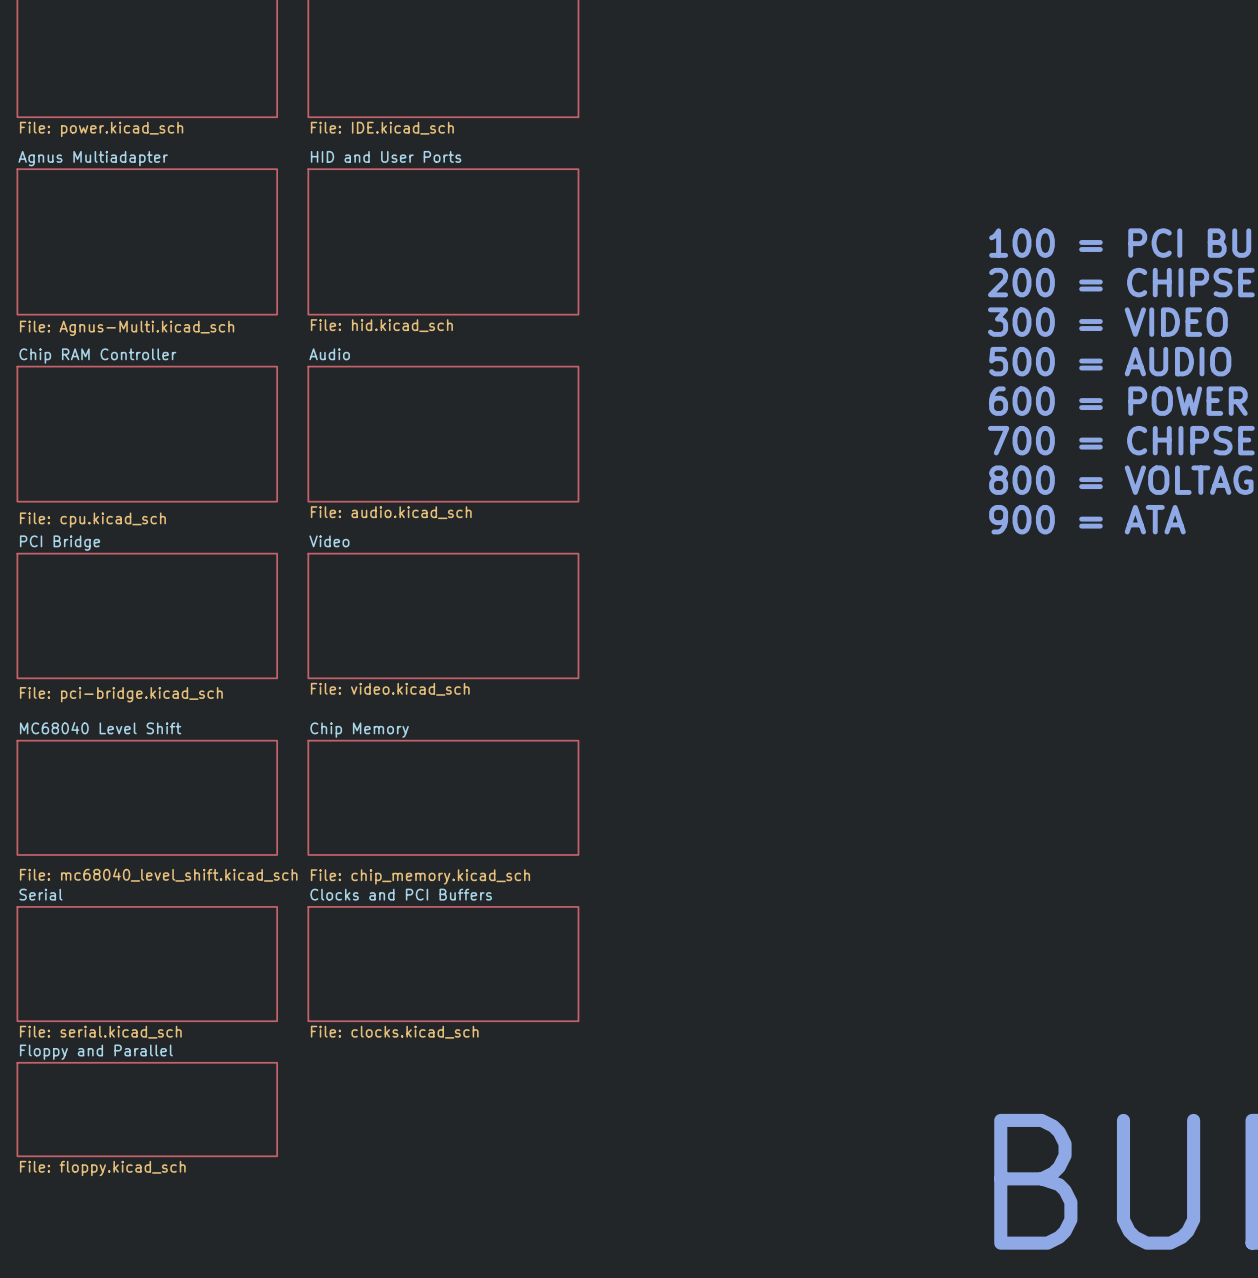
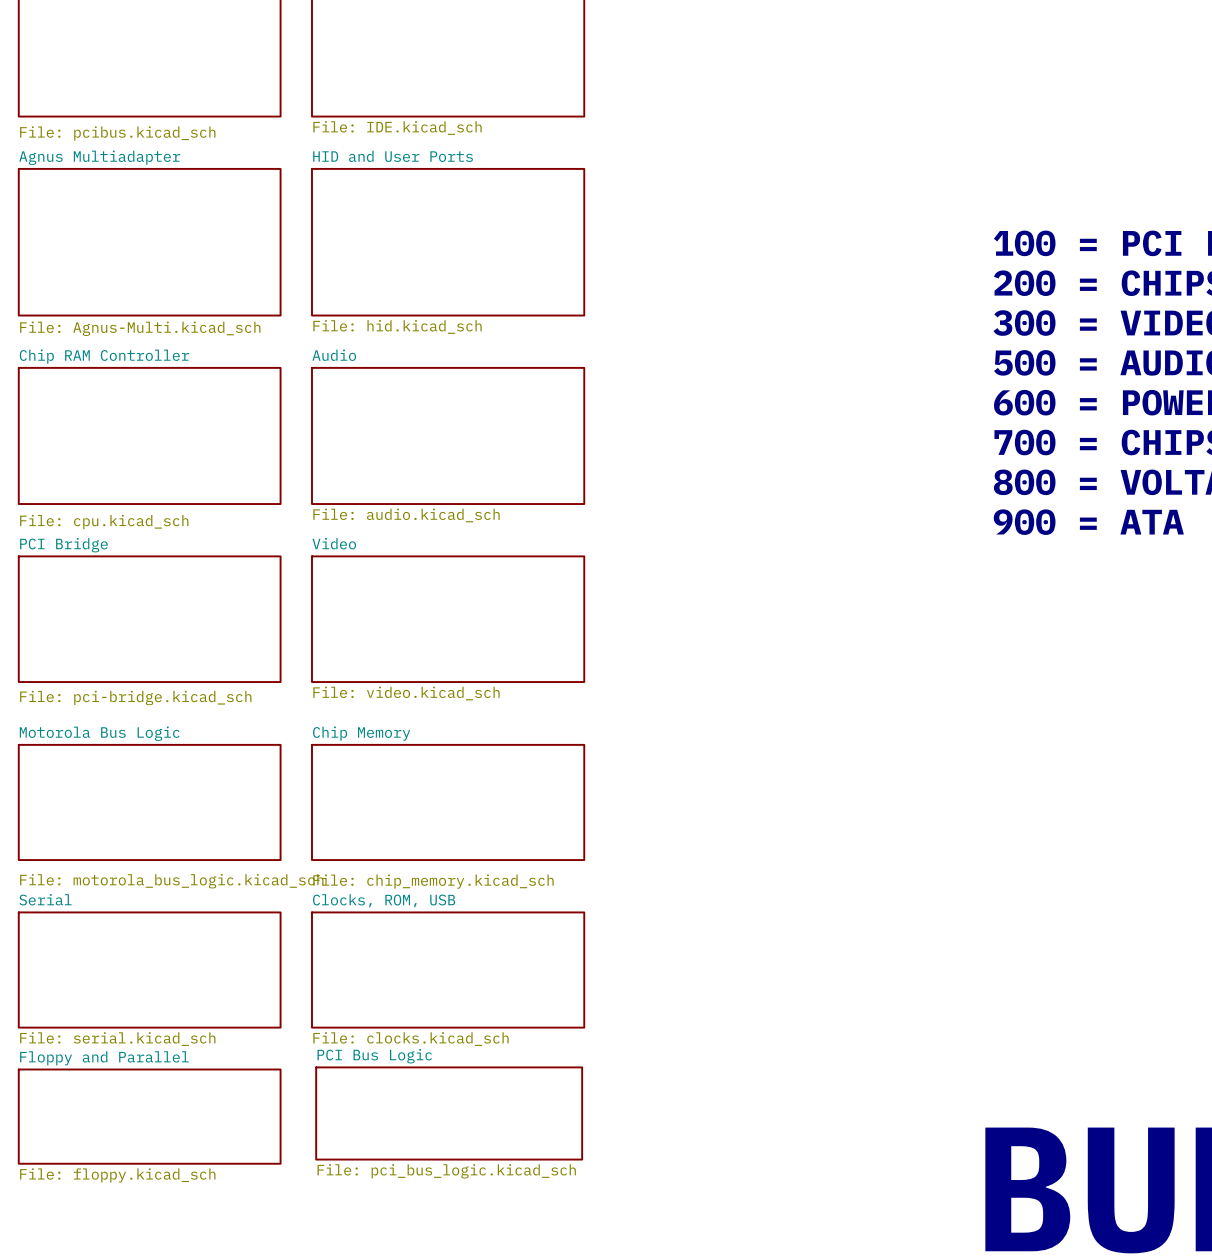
sheet value: File: power.kicad_sch (101, 129) -> File: pcibus.kicad_sch (117, 133)
sheet MC68040 Level Shift name: MC68040 Level Shift (100, 728) -> Motorola Bus Logic (99, 733)
sheet MC68040 Level Shift value: File: mc68040_level_shift.kicad_sch (158, 875) -> File: motorola_bus_logic.kicad_sch (171, 881)
sheet Clocks and PCI Buffers name: Clocks and PCI Buffers (401, 894) -> Clocks, ROM, USB (384, 900)
sheet PCI Bus Logic: none -> File: pci_bus_logic.kicad_sch (449, 1113)

